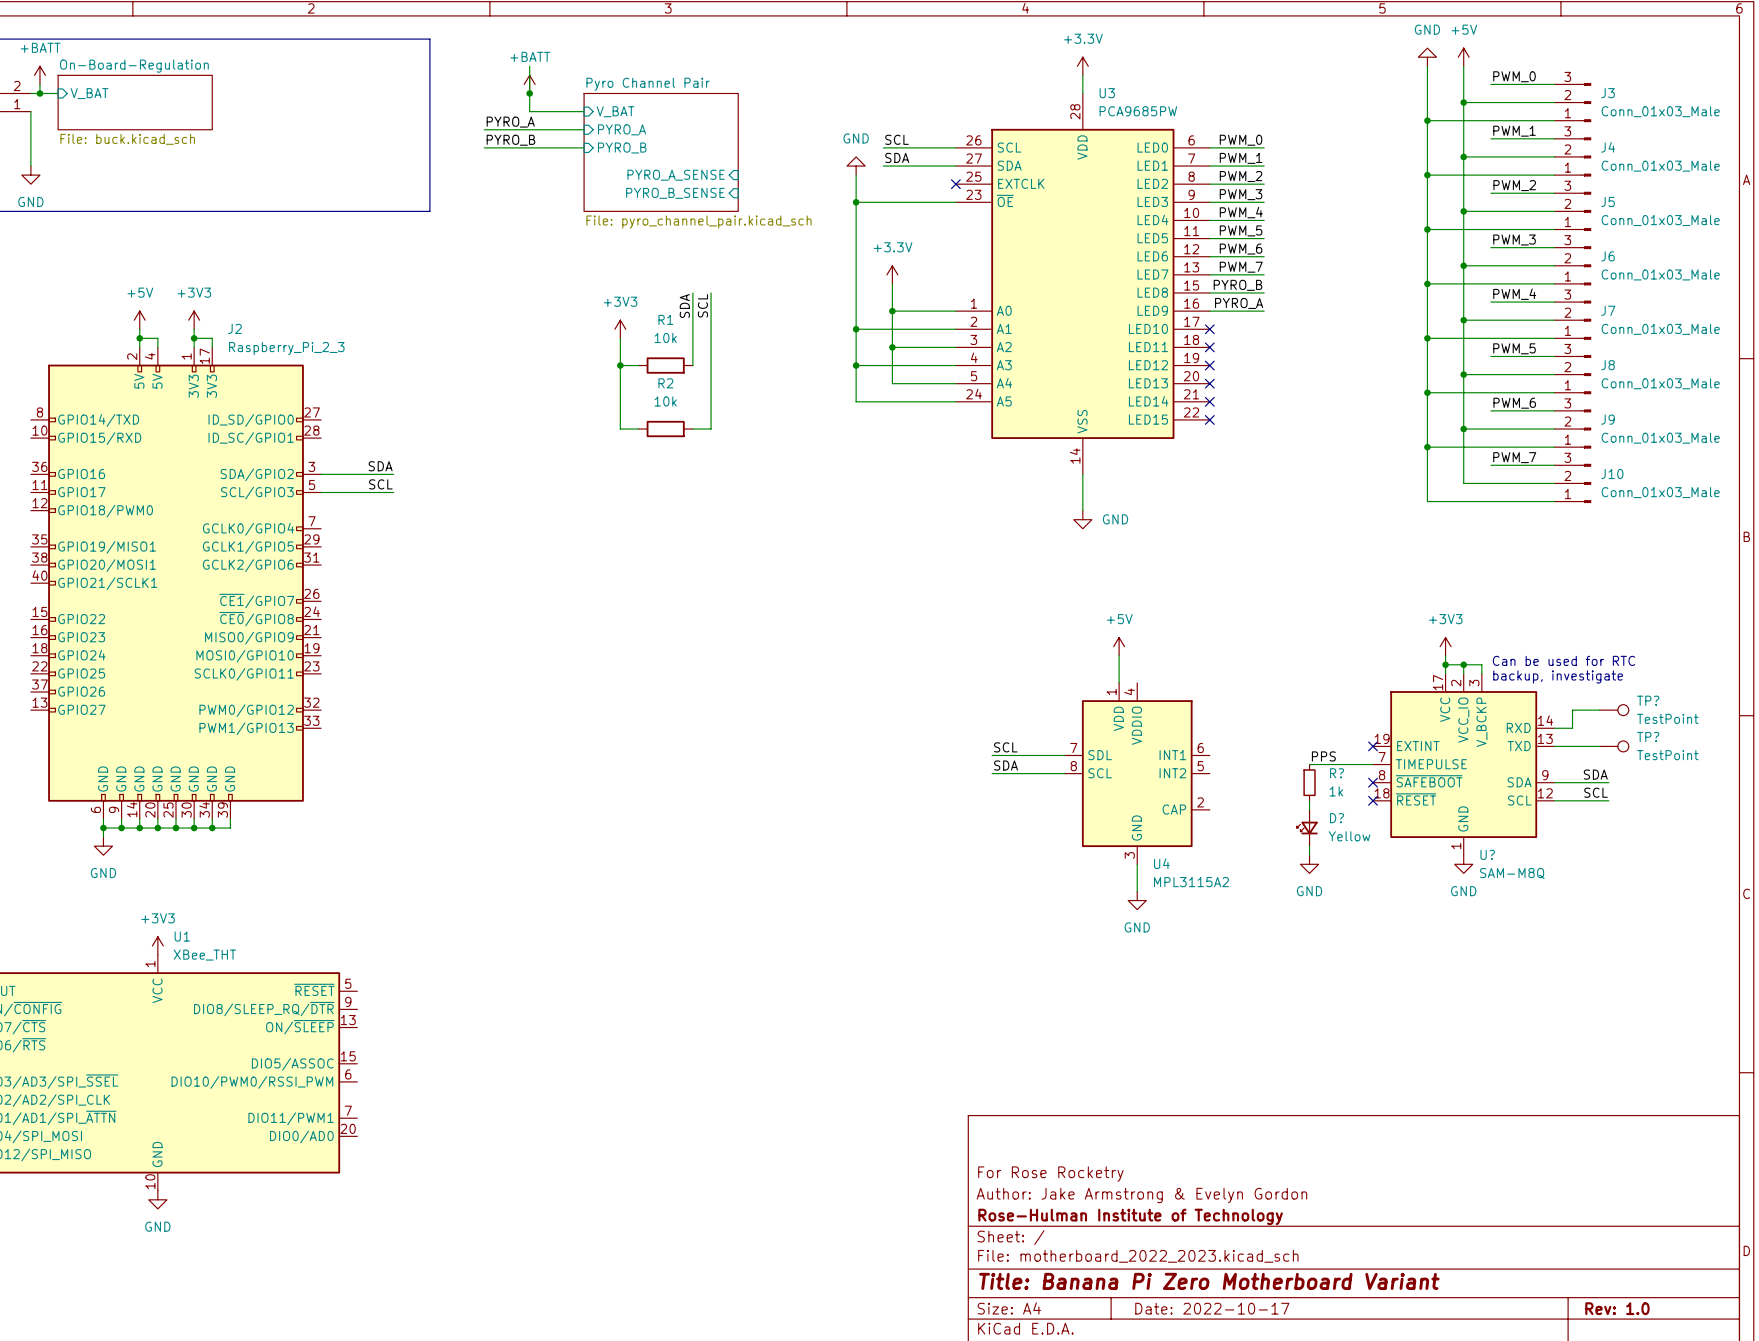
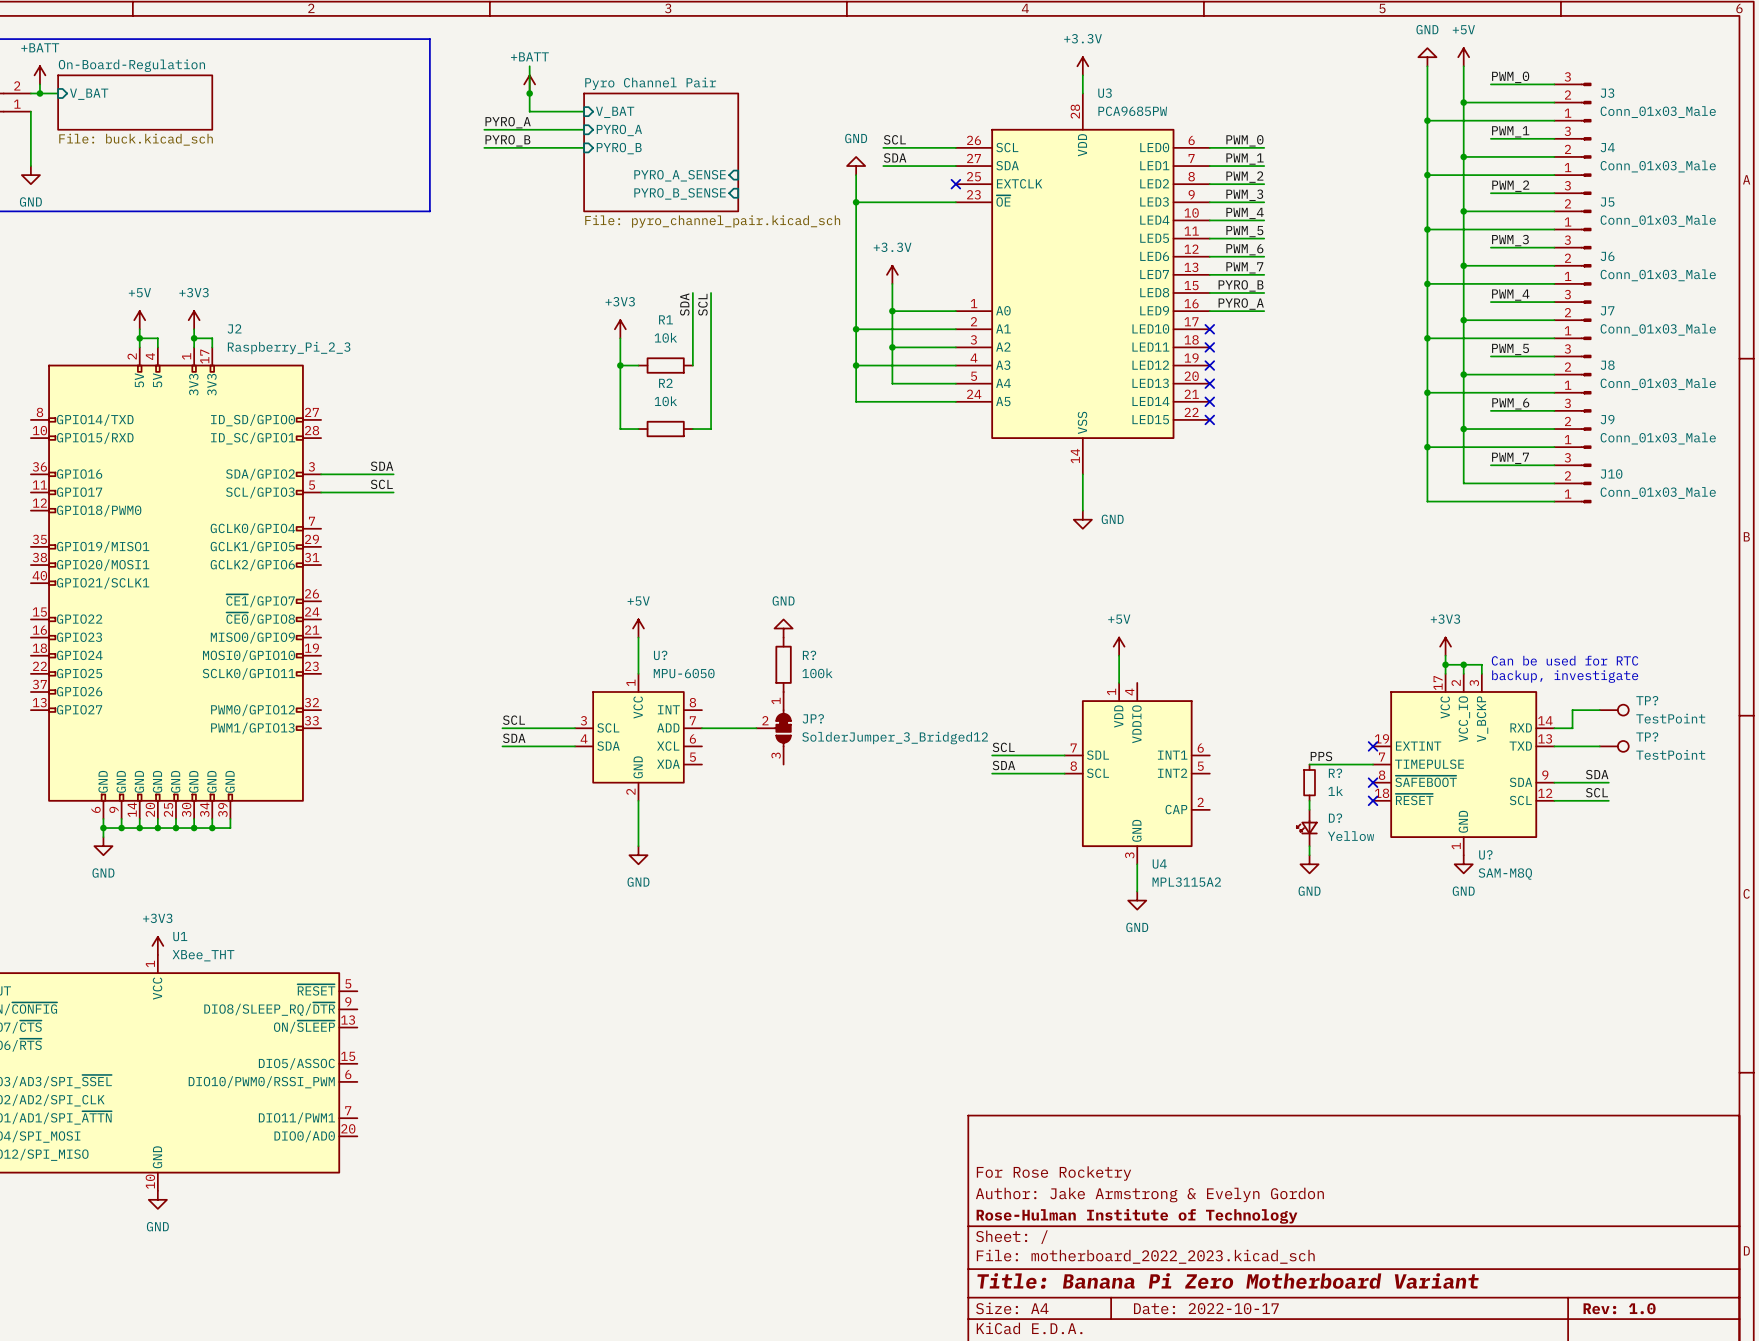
power symbol: none -> +5V (638, 628)
power symbol: none -> GND (783, 628)
wire: none -> (638, 637) (638, 673)
R?: none -> 100k (783, 664)
label: none -> SCL (514, 720)
wire: none -> (502, 728) (575, 728)
wire: none -> (701, 728) (756, 728)
JP?: none -> SolderJumper_3_Bridged12 (773, 728)
U?: none -> MPU-6050 (638, 737)
label: none -> SDA (514, 738)
wire: none -> (502, 746) (575, 746)
wire: none -> (638, 800) (638, 846)
power symbol: none -> GND (638, 855)

